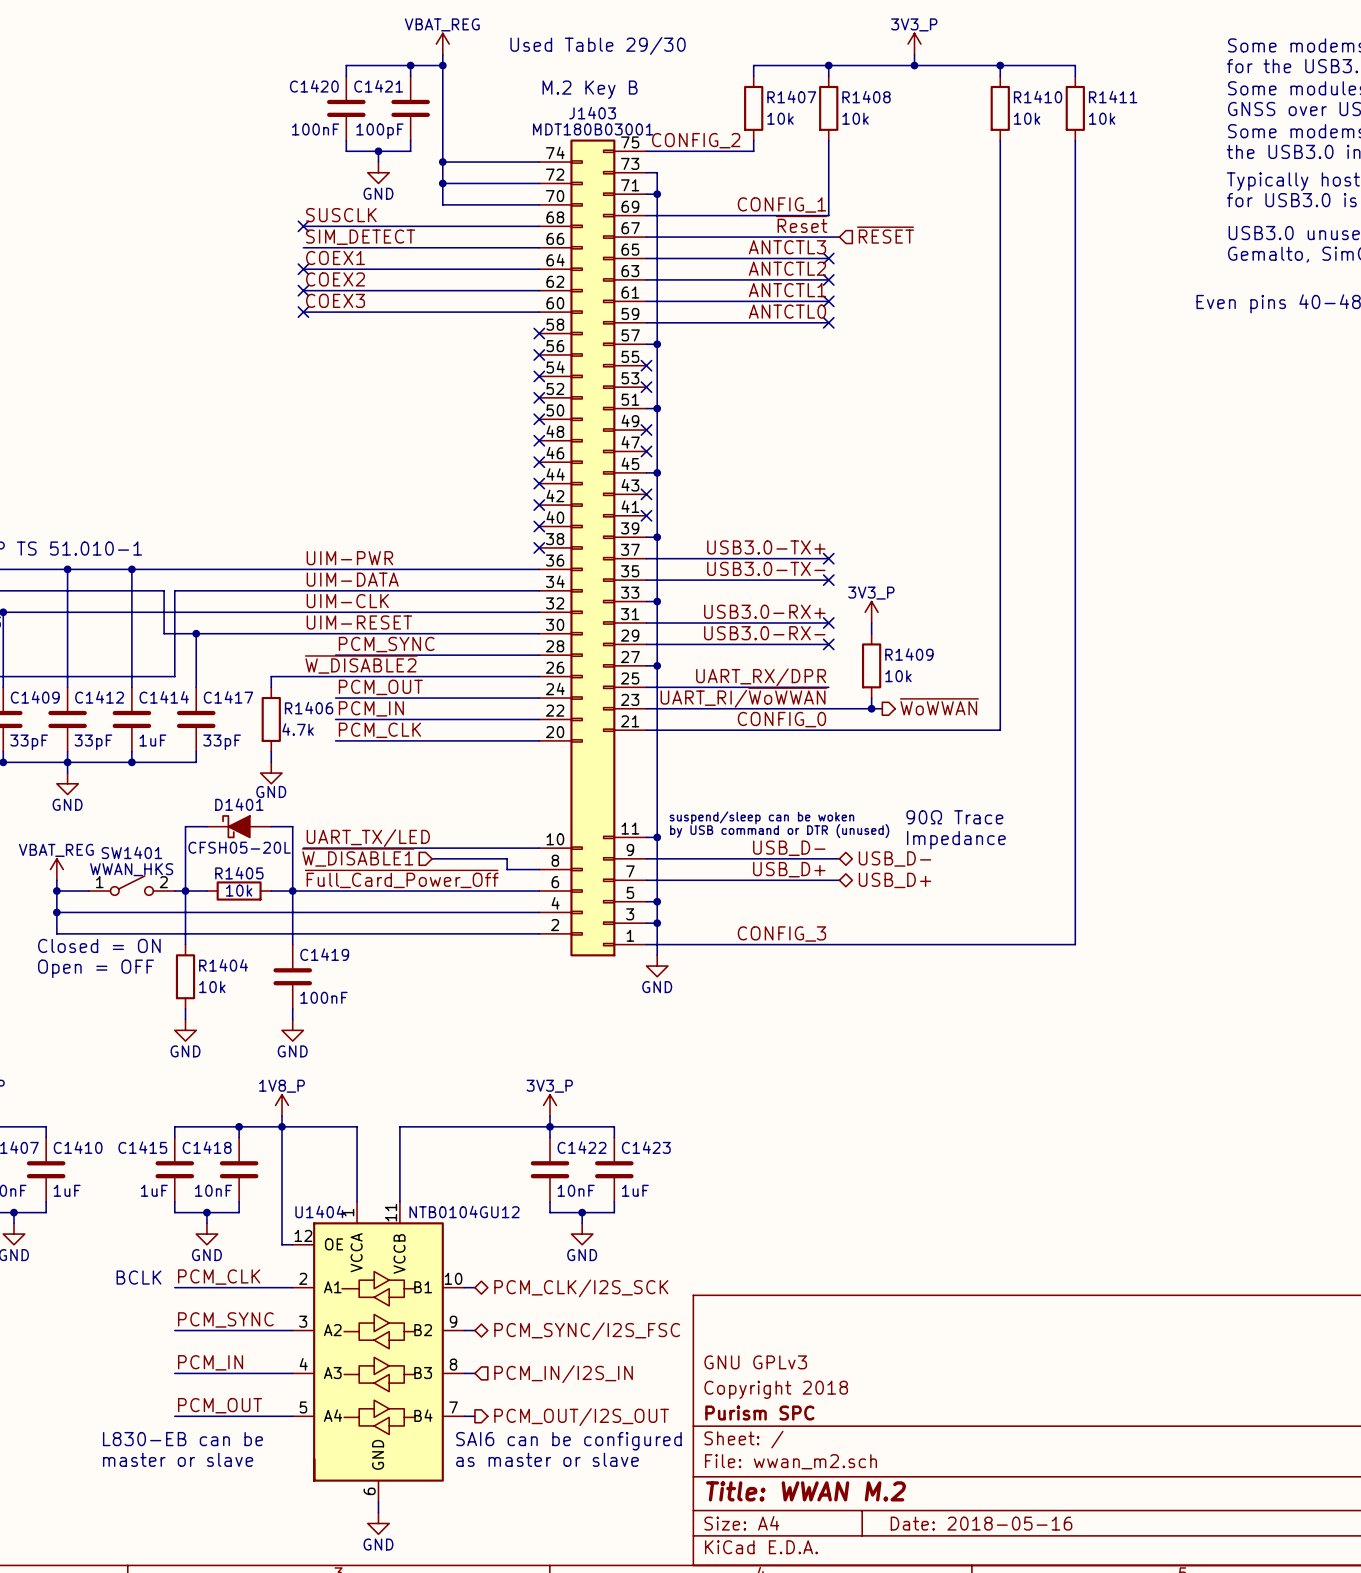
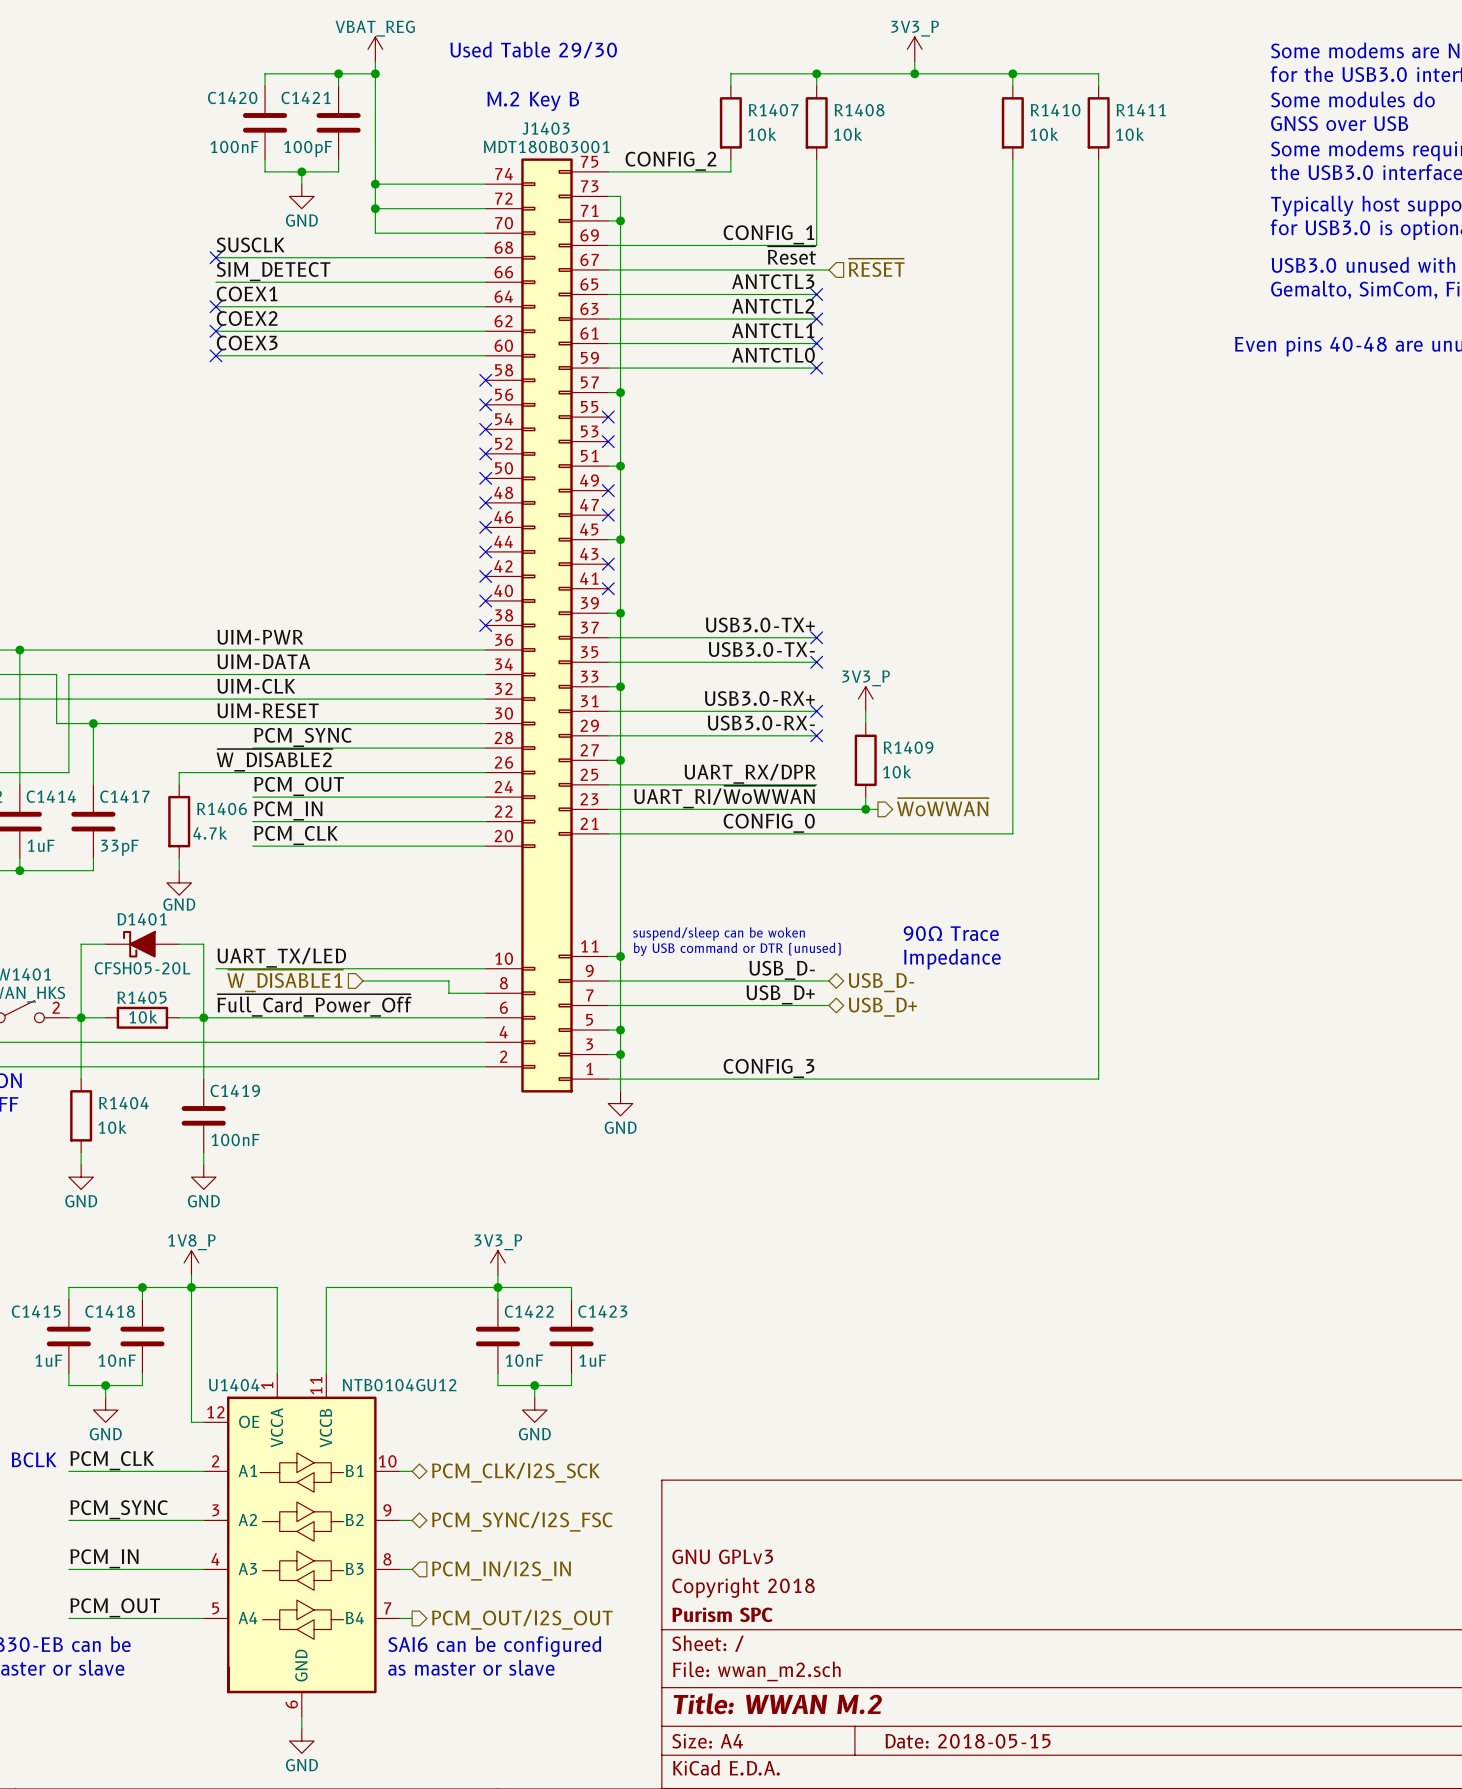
title block: Date: 2018-05-16 (981, 1523) -> Date: 2018-05-15 (968, 1741)

